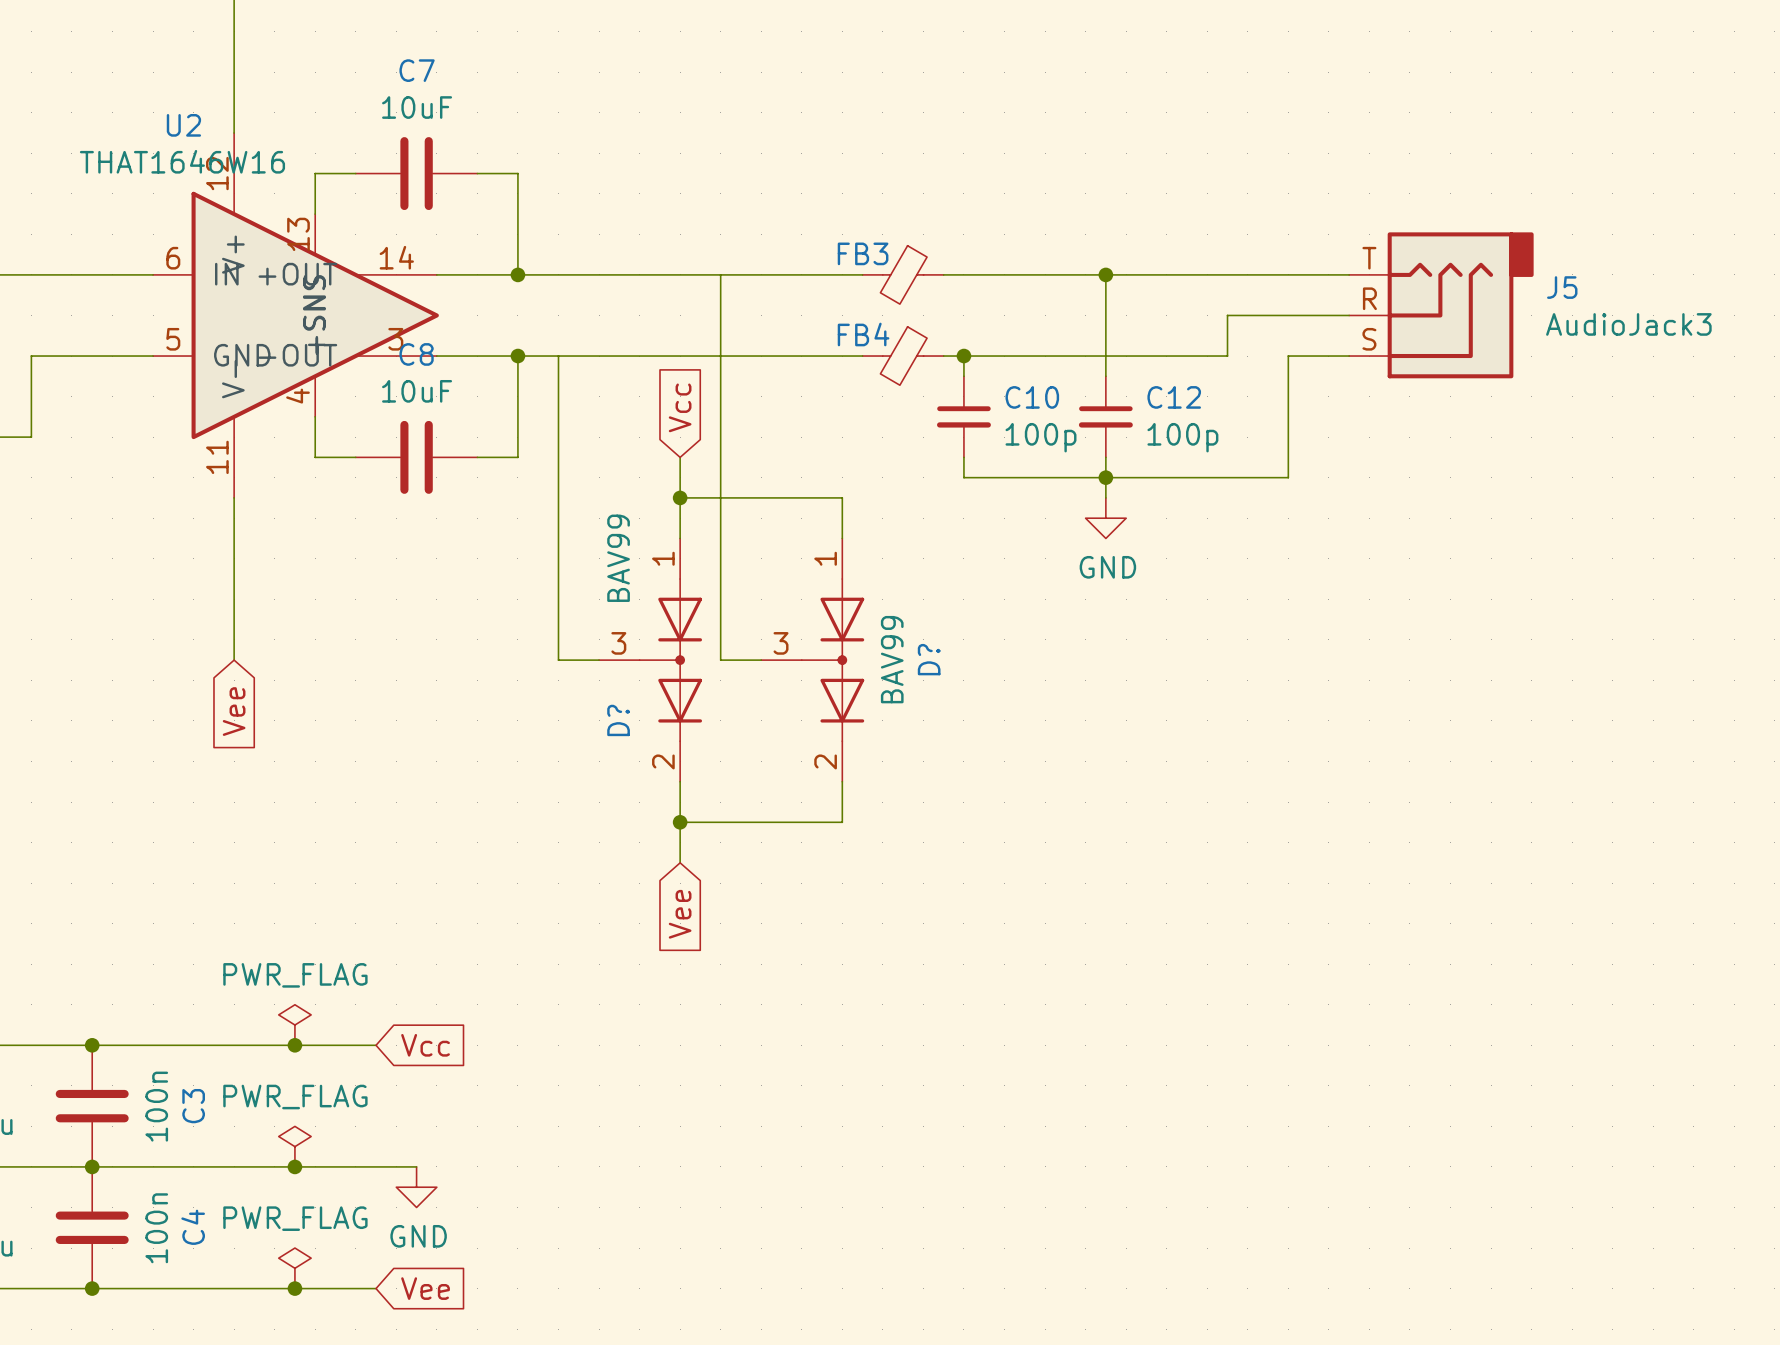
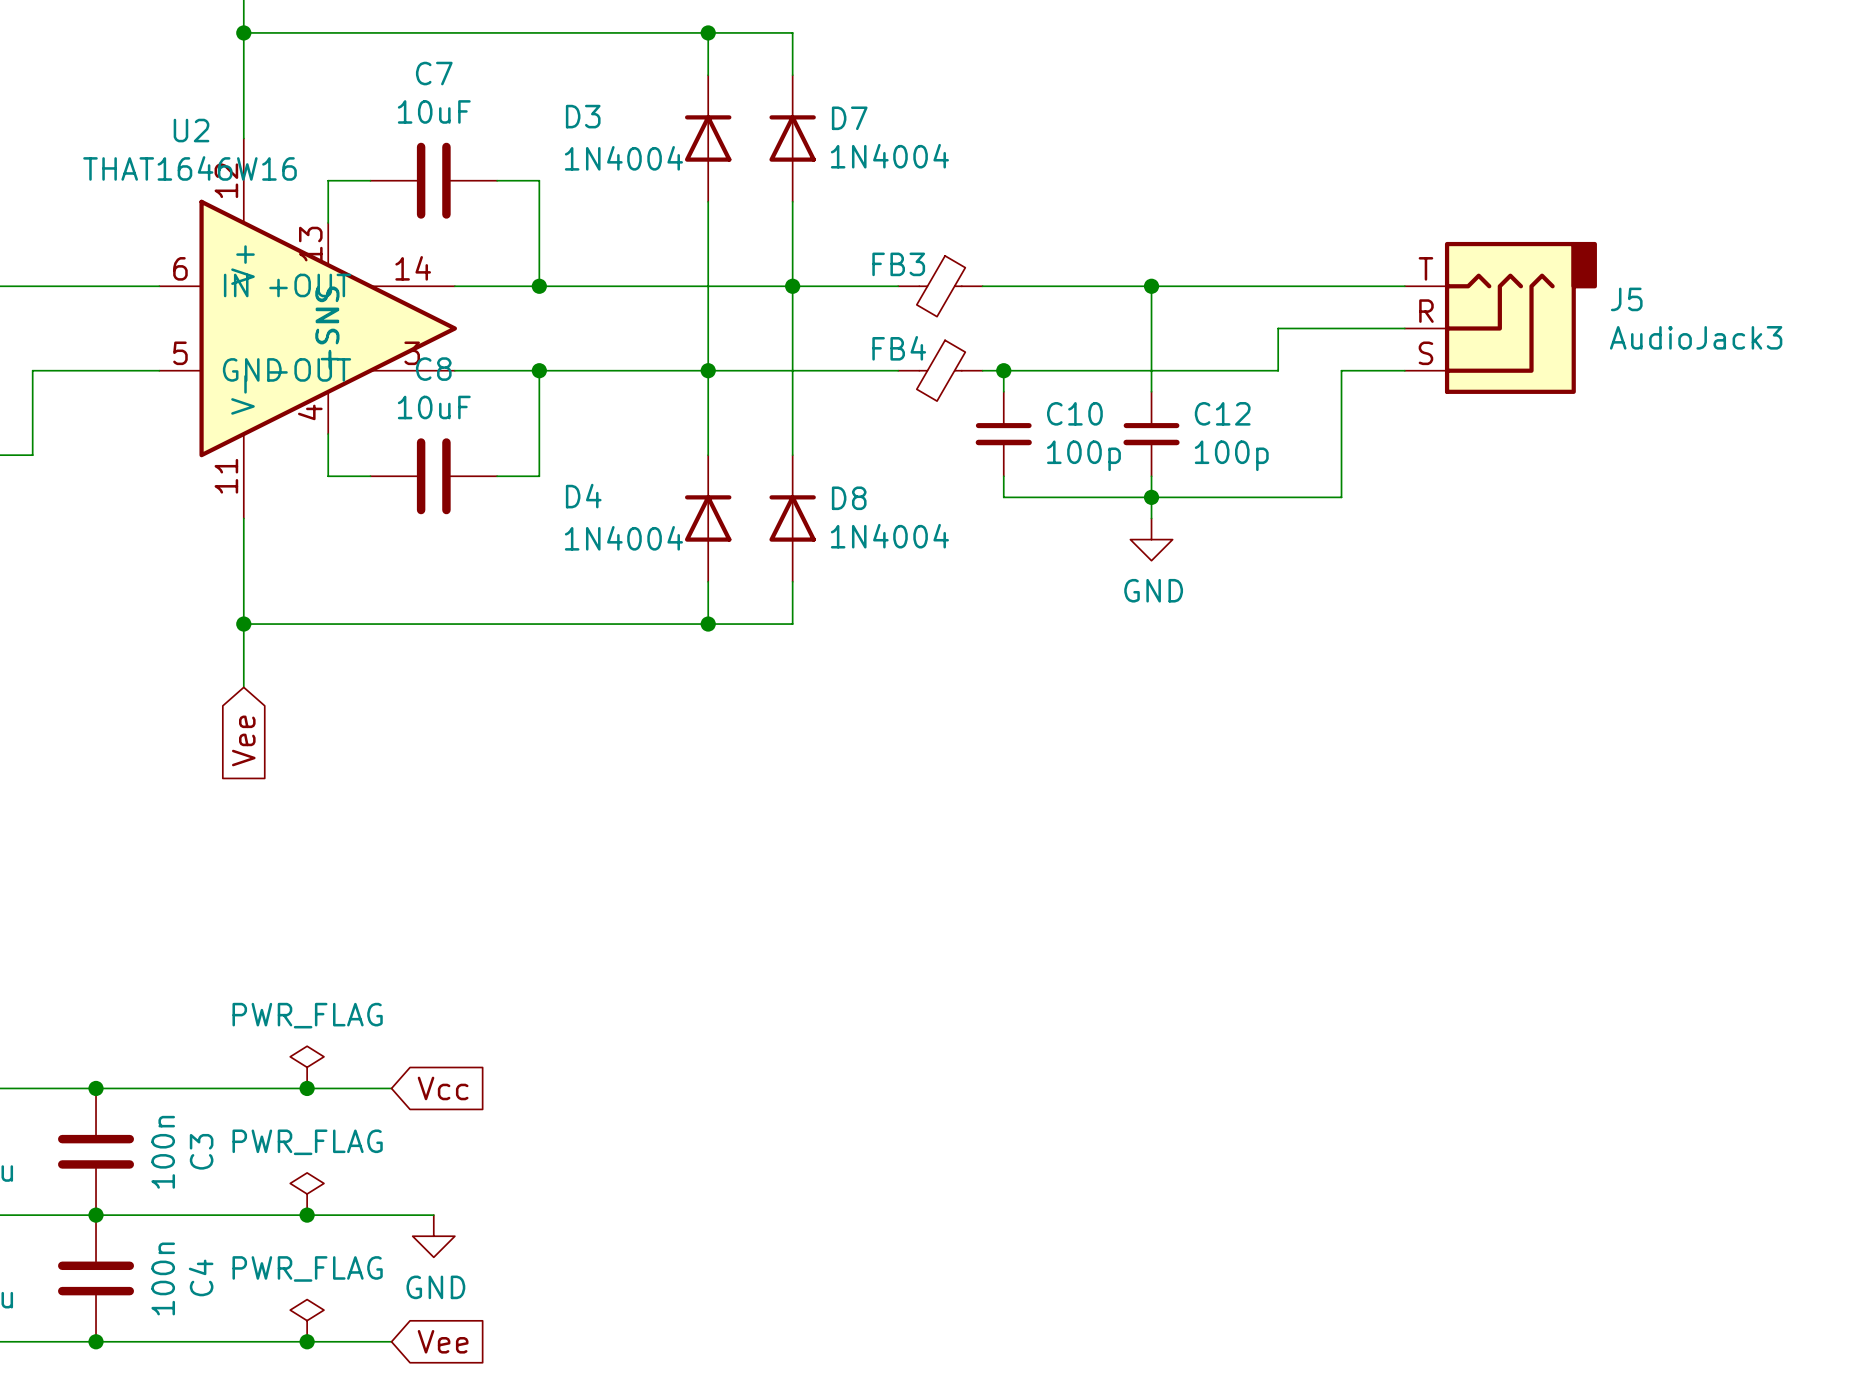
wire: none -> (243, 32) (792, 32) (792, 75)
junction: none -> (243, 32)
wire: none -> (708, 32) (708, 75)
junction: none -> (708, 32)
D3: none -> 1N4004 (708, 138)
D7: none -> 1N4004 (792, 138)
wire: none -> (708, 201) (708, 455)
wire: none -> (792, 201) (792, 455)
wire: (720, 274) (720, 660) (761, 660) -> none
junction: none -> (792, 286)
wire: (558, 356) (558, 660) (599, 660) -> none
junction: none -> (708, 370)
global label: Vcc (680, 407) -> none
wire: (680, 497) (842, 497) (842, 538) -> none
D4: none -> 1N4004 (708, 518)
junction: (680, 497) -> none
D8: none -> 1N4004 (792, 518)
wire: none -> (792, 581) (792, 624) (243, 624)
junction: none -> (243, 624)
junction: none -> (708, 624)
D?: BAV99 (650, 660) -> none
D?: BAV99 (812, 660) -> none
wire: (680, 781) (680, 862) -> none
wire: (842, 781) (842, 822) (680, 822) -> none
junction: (680, 822) -> none
global label: Vee (680, 914) -> none

